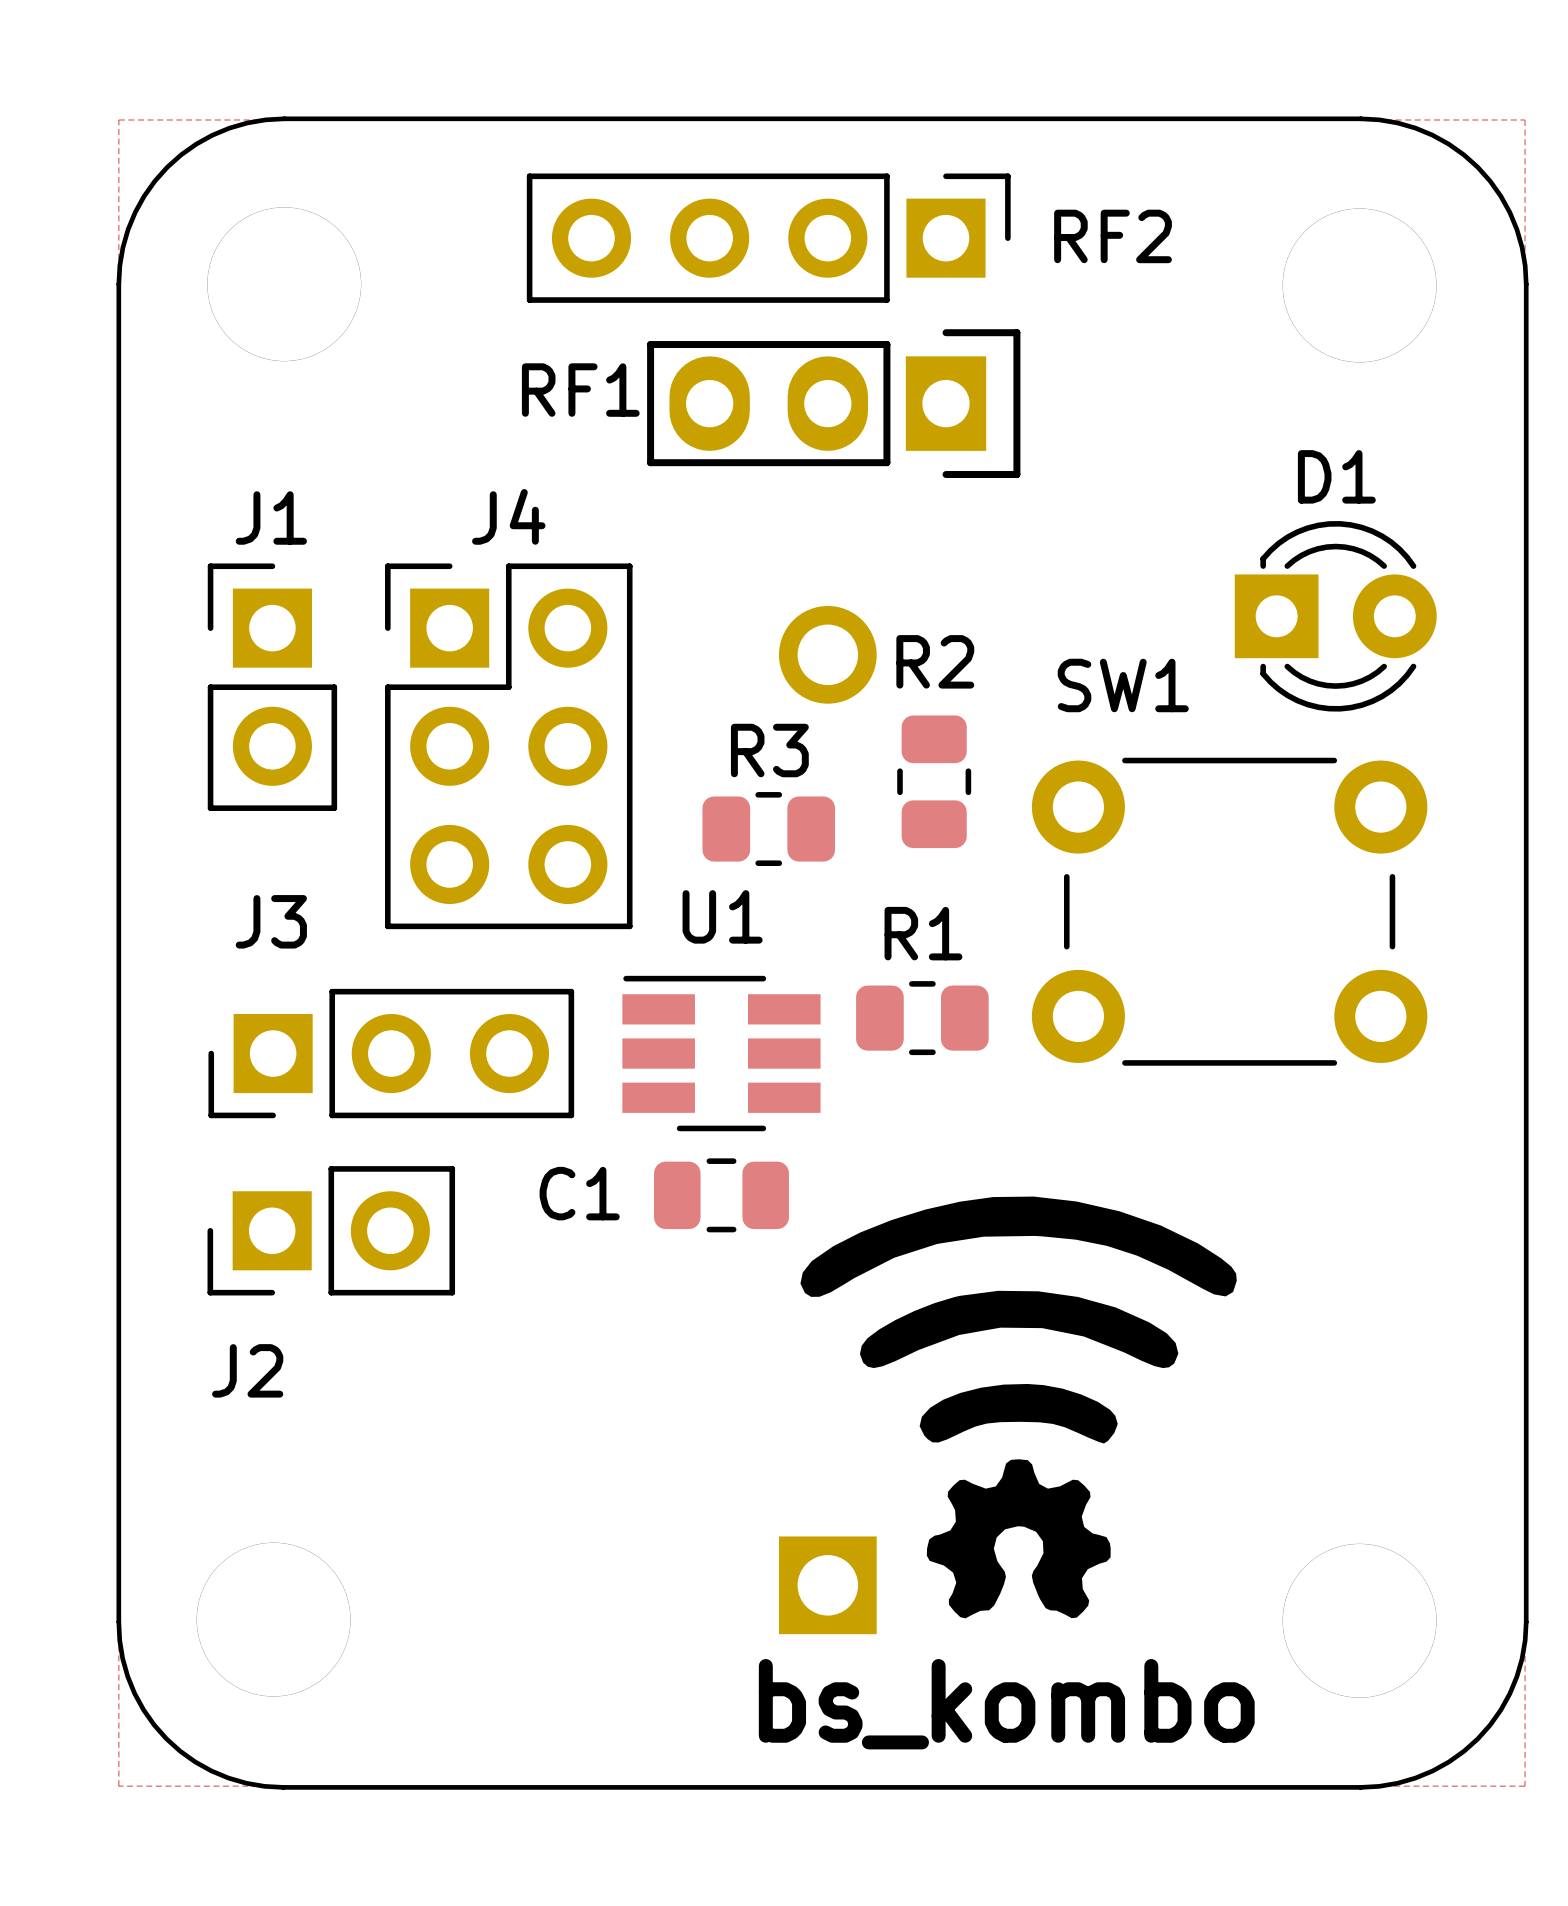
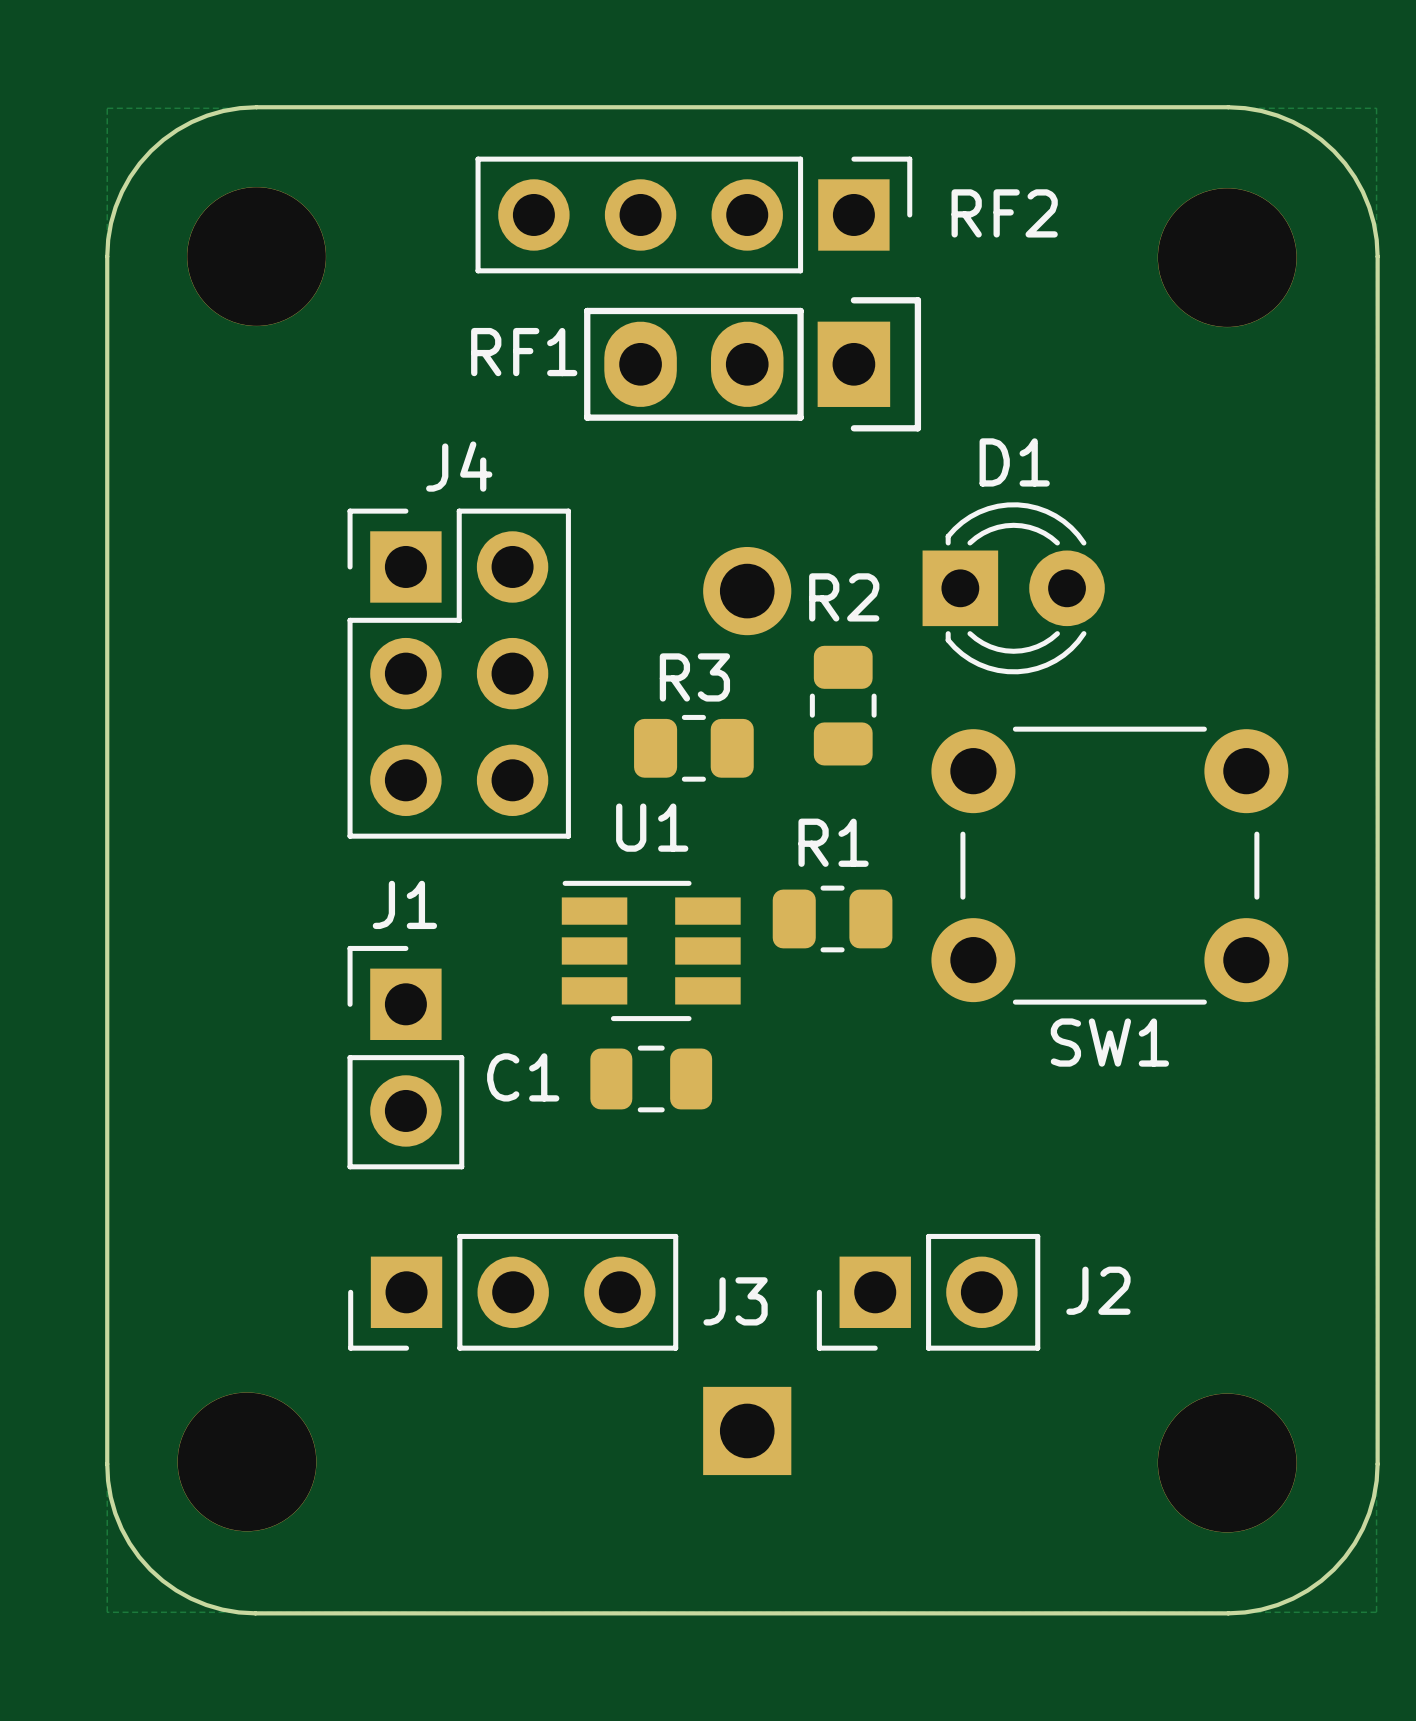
D1 position: (1335, 616) -> (1013, 588)
SW1 name position: SW1 (1123, 685) -> SW1 (1109, 1042)
J1 position: (272, 687) -> (405, 1057)
SW1 position: (1229, 911) -> (1109, 865)
J3 name position: J3 (271, 921) -> J3 (735, 1301)
J3 position: (391, 1053) -> (513, 1292)
drawing: [800, 1196, 1237, 1619] -> none
J2 position: (331, 1230) -> (928, 1292)
J2 name position: J2 (247, 1370) -> J2 (1098, 1290)
text: bs_kombo (1006, 1704) -> none

